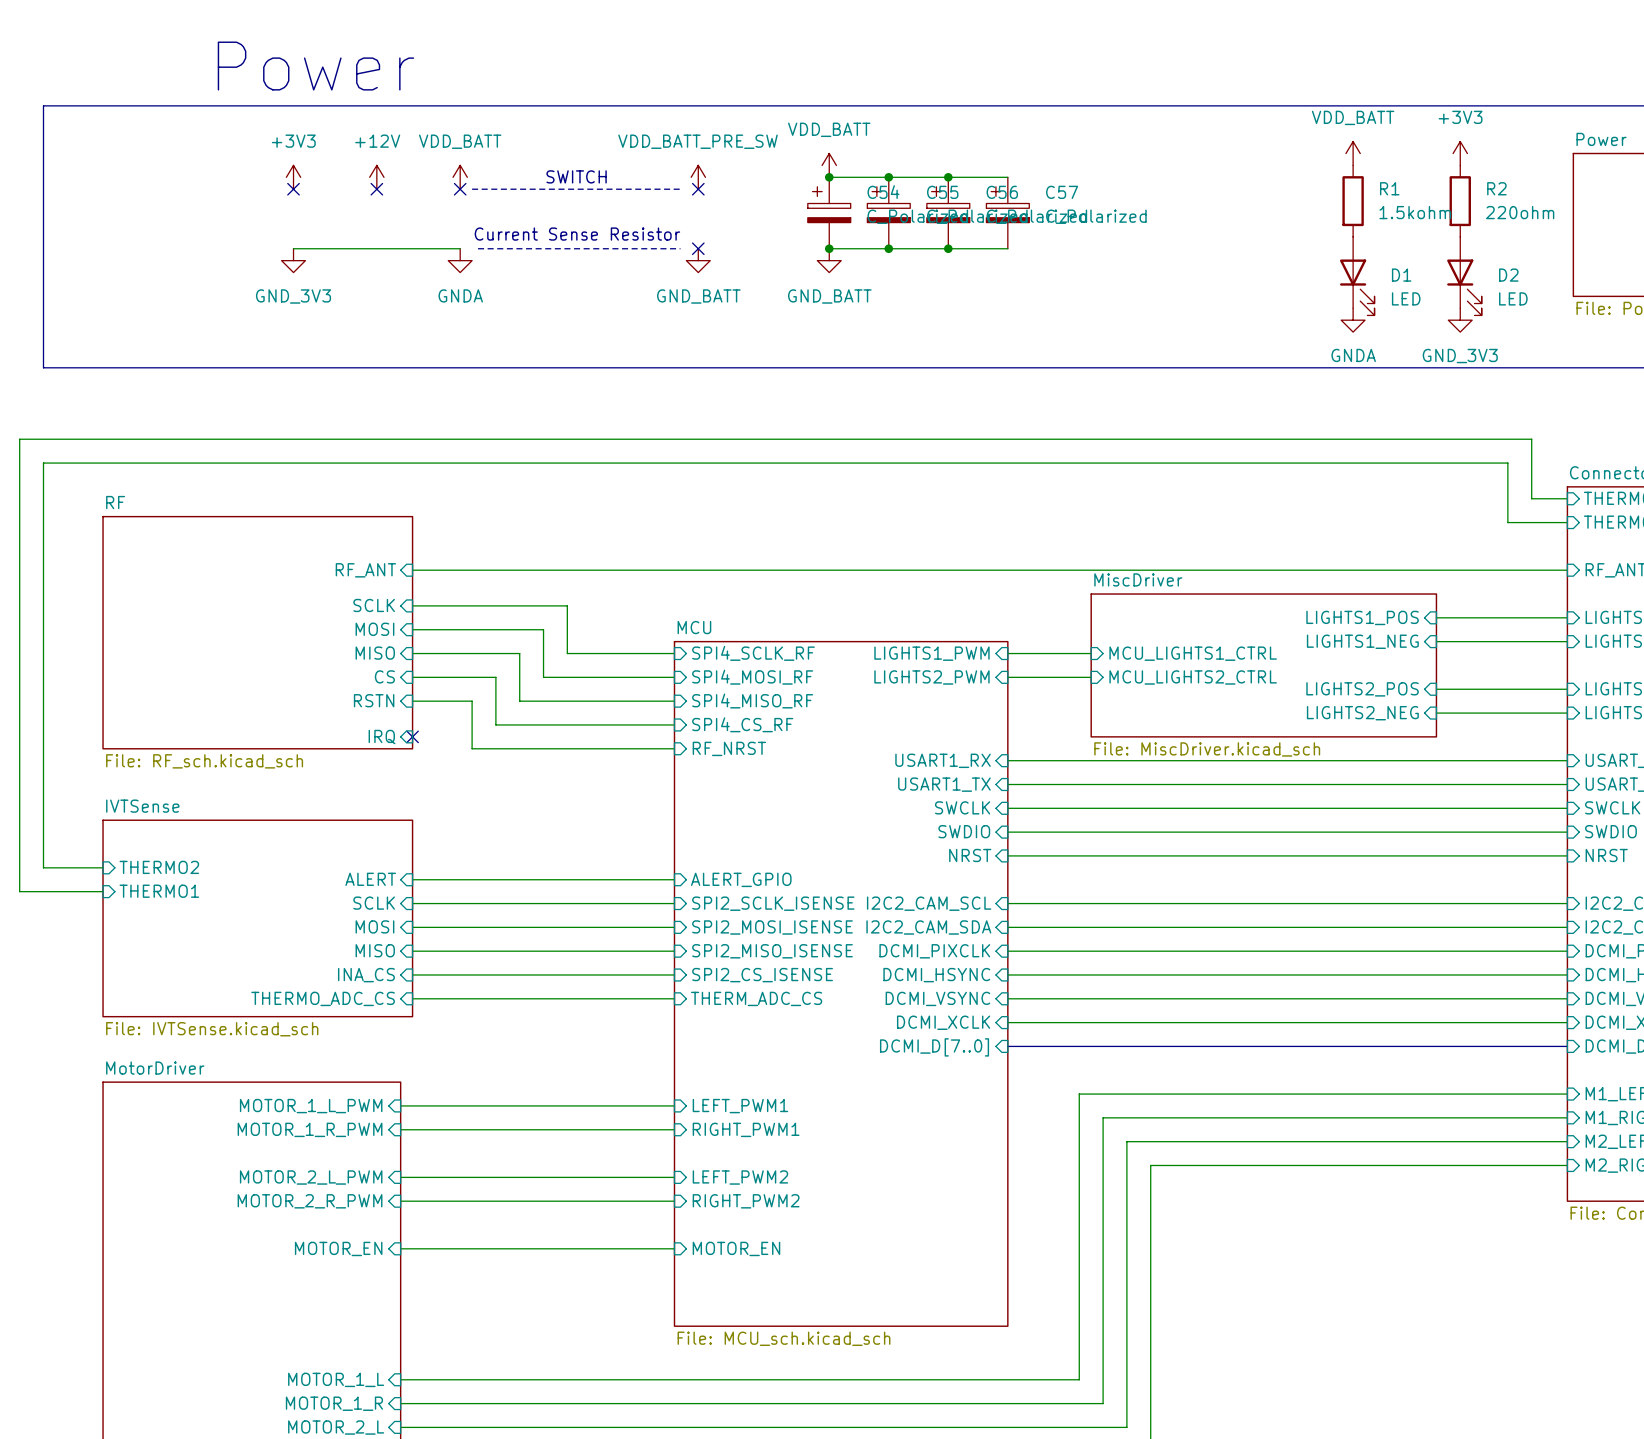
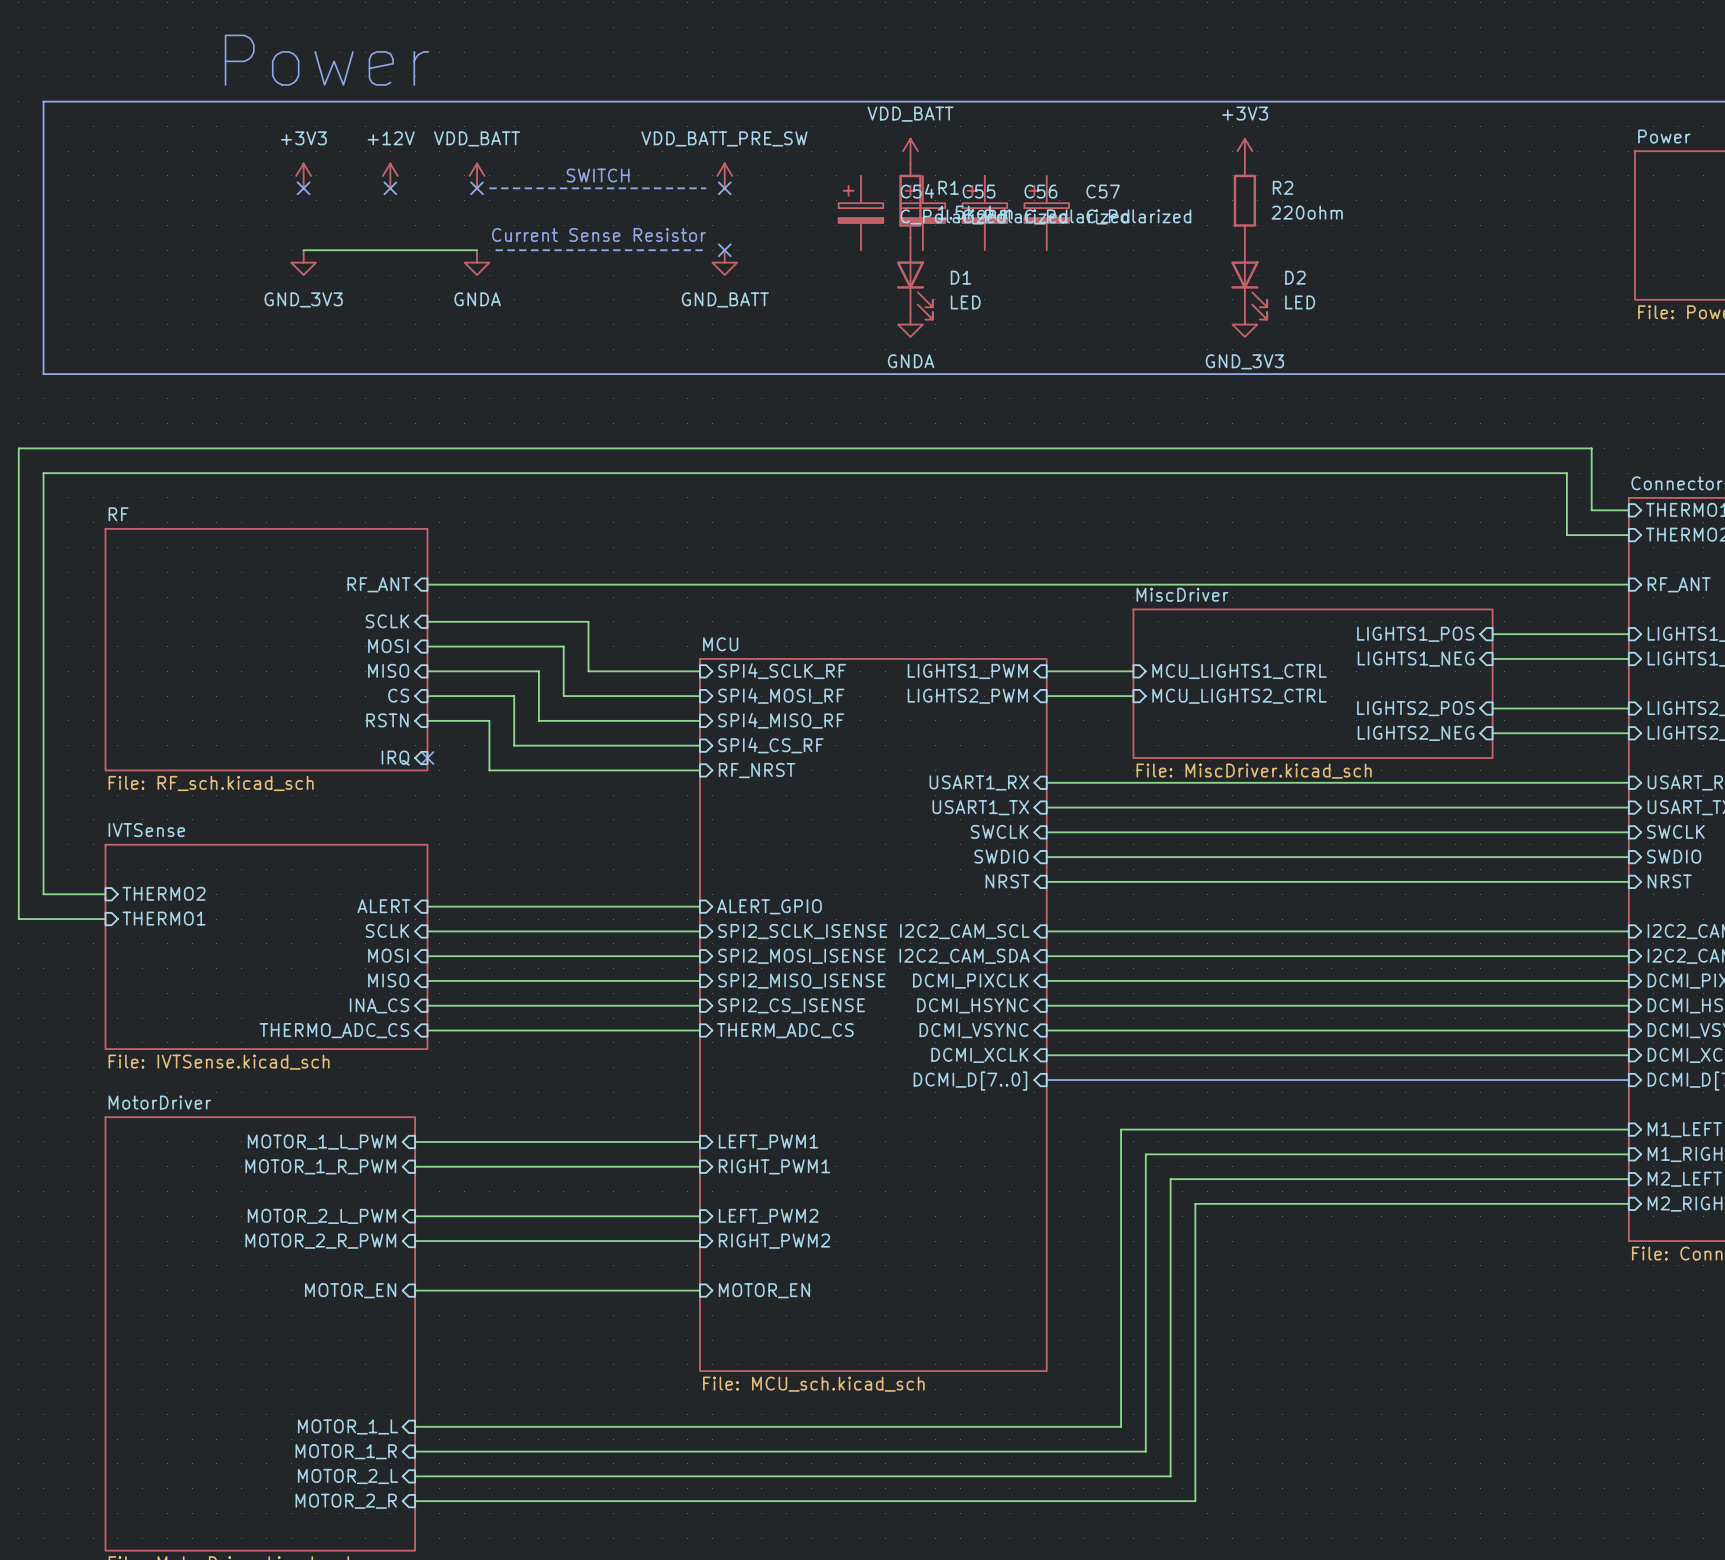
power symbol: none -> +3V3 (1244, 151)
power symbol: VDD_BATT (1353, 153) -> none
power symbol: +3V3 (1460, 153) -> none
power symbol position: VDD_BATT (829, 165) -> VDD_BATT (910, 151)
wire: (829, 177) (1007, 177) -> none
junction: (829, 177) -> none
junction: (888, 177) -> none
junction: (948, 177) -> none
R1 position: (1353, 201) -> (910, 200)
R2 position: (1460, 201) -> (1244, 200)
wire: (829, 248) (1007, 248) -> none
junction: (829, 248) -> none
junction: (888, 248) -> none
junction: (948, 248) -> none
power symbol: GND_BATT (829, 260) -> none
D1 position: (1357, 276) -> (914, 278)
D2 position: (1464, 276) -> (1249, 278)
power symbol: none -> GNDA (910, 324)
power symbol: none -> GND_3V3 (1244, 324)
power symbol: GNDA (1353, 320) -> none
power symbol: GND_3V3 (1460, 320) -> none

